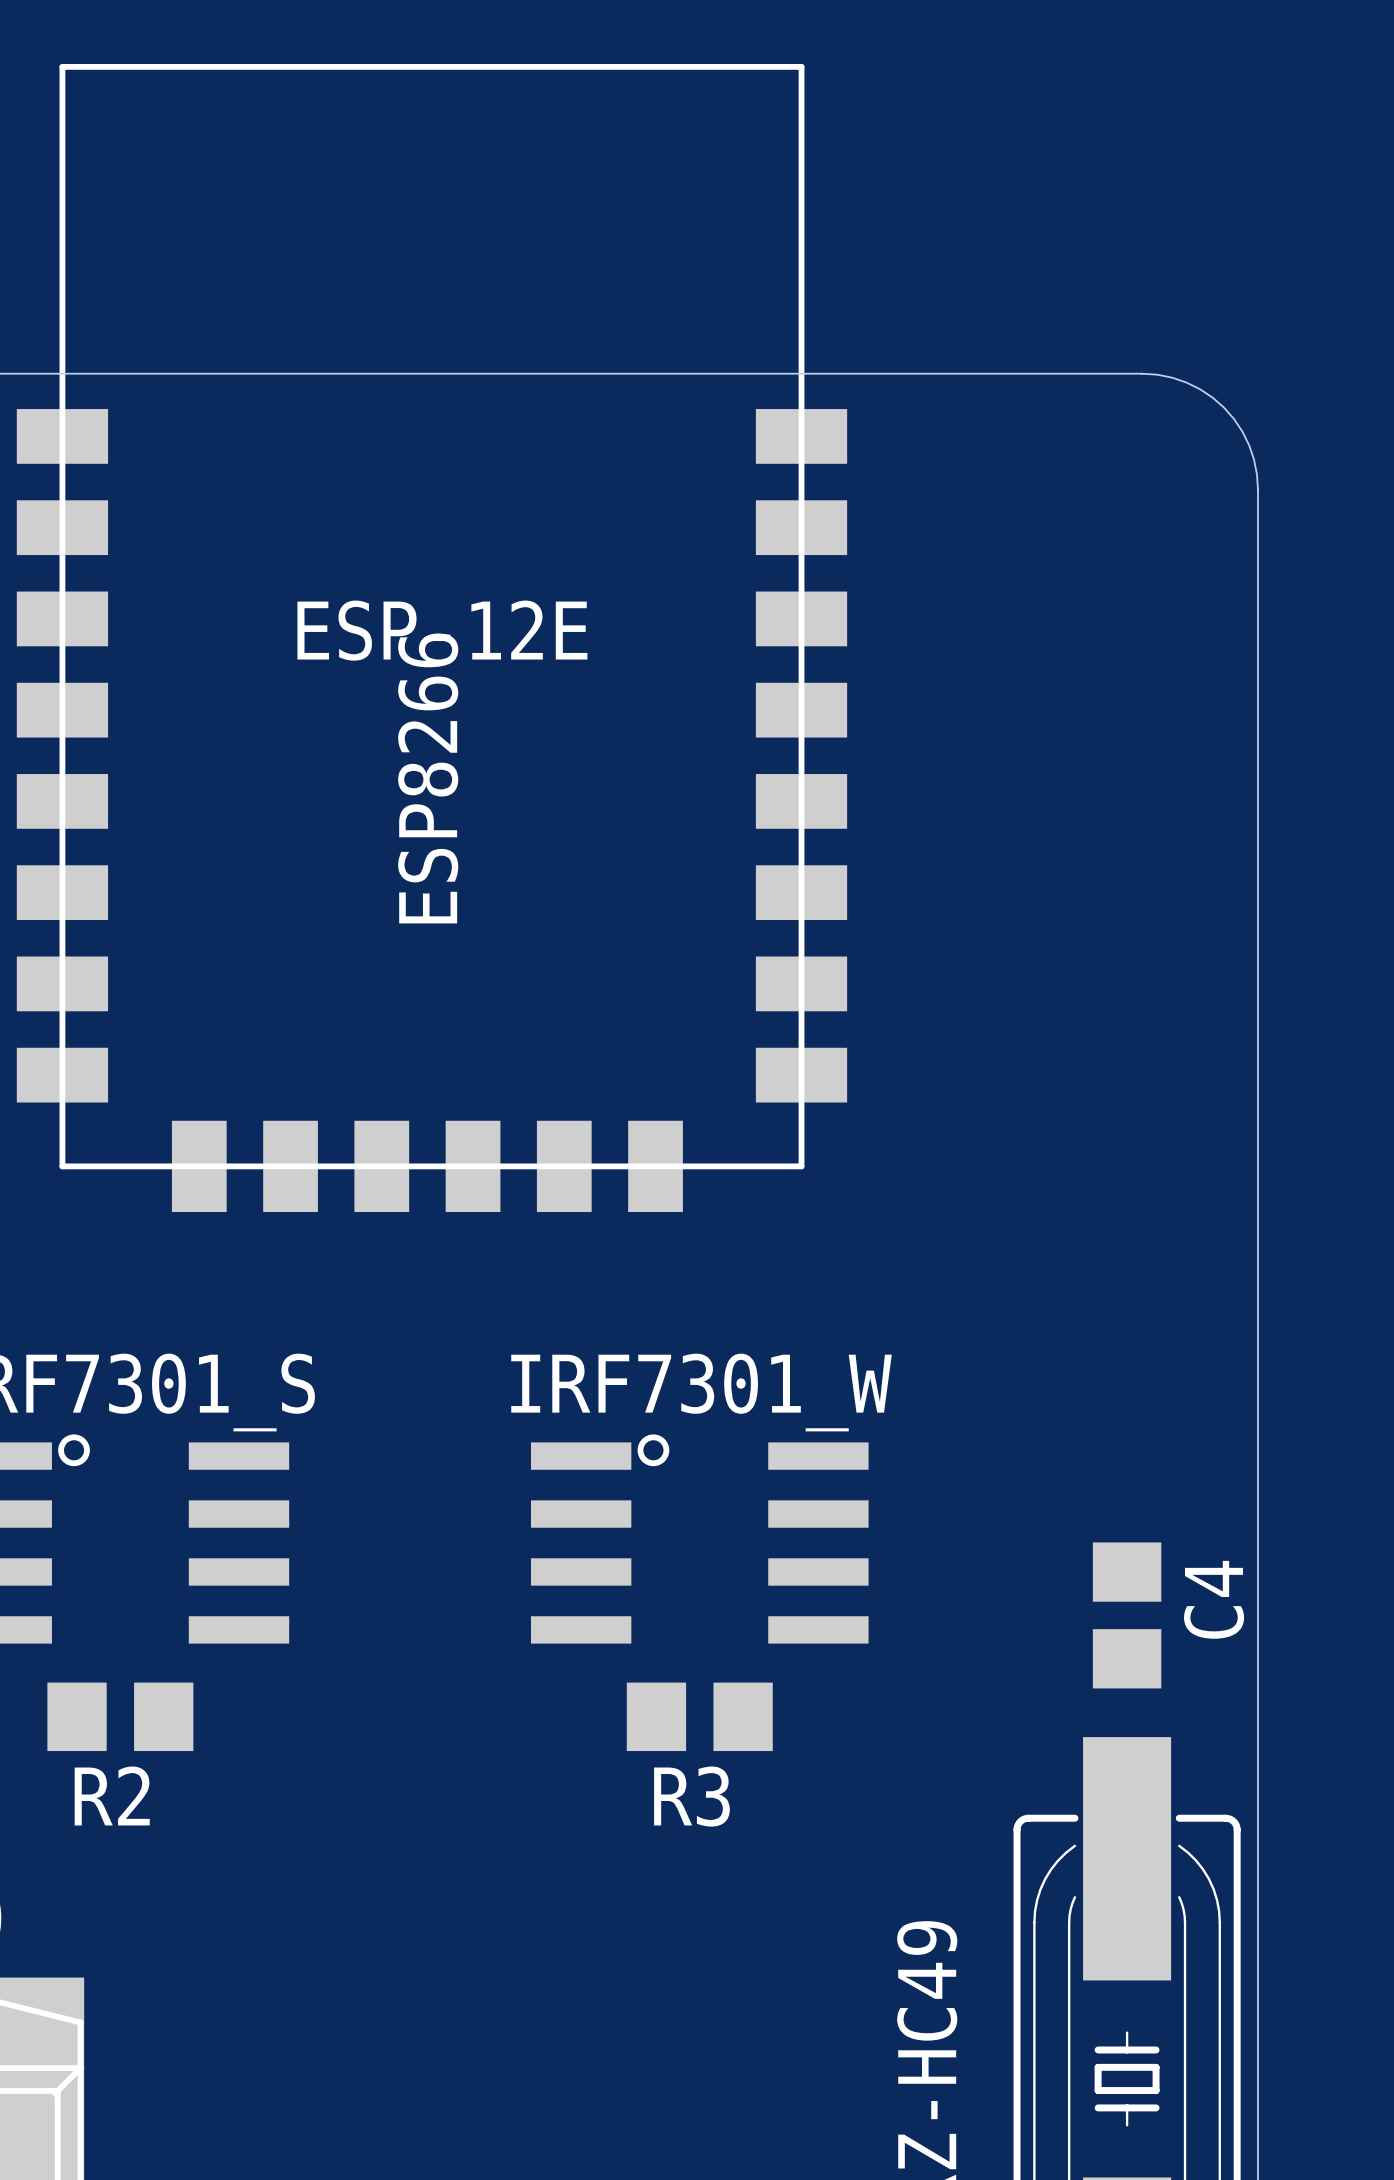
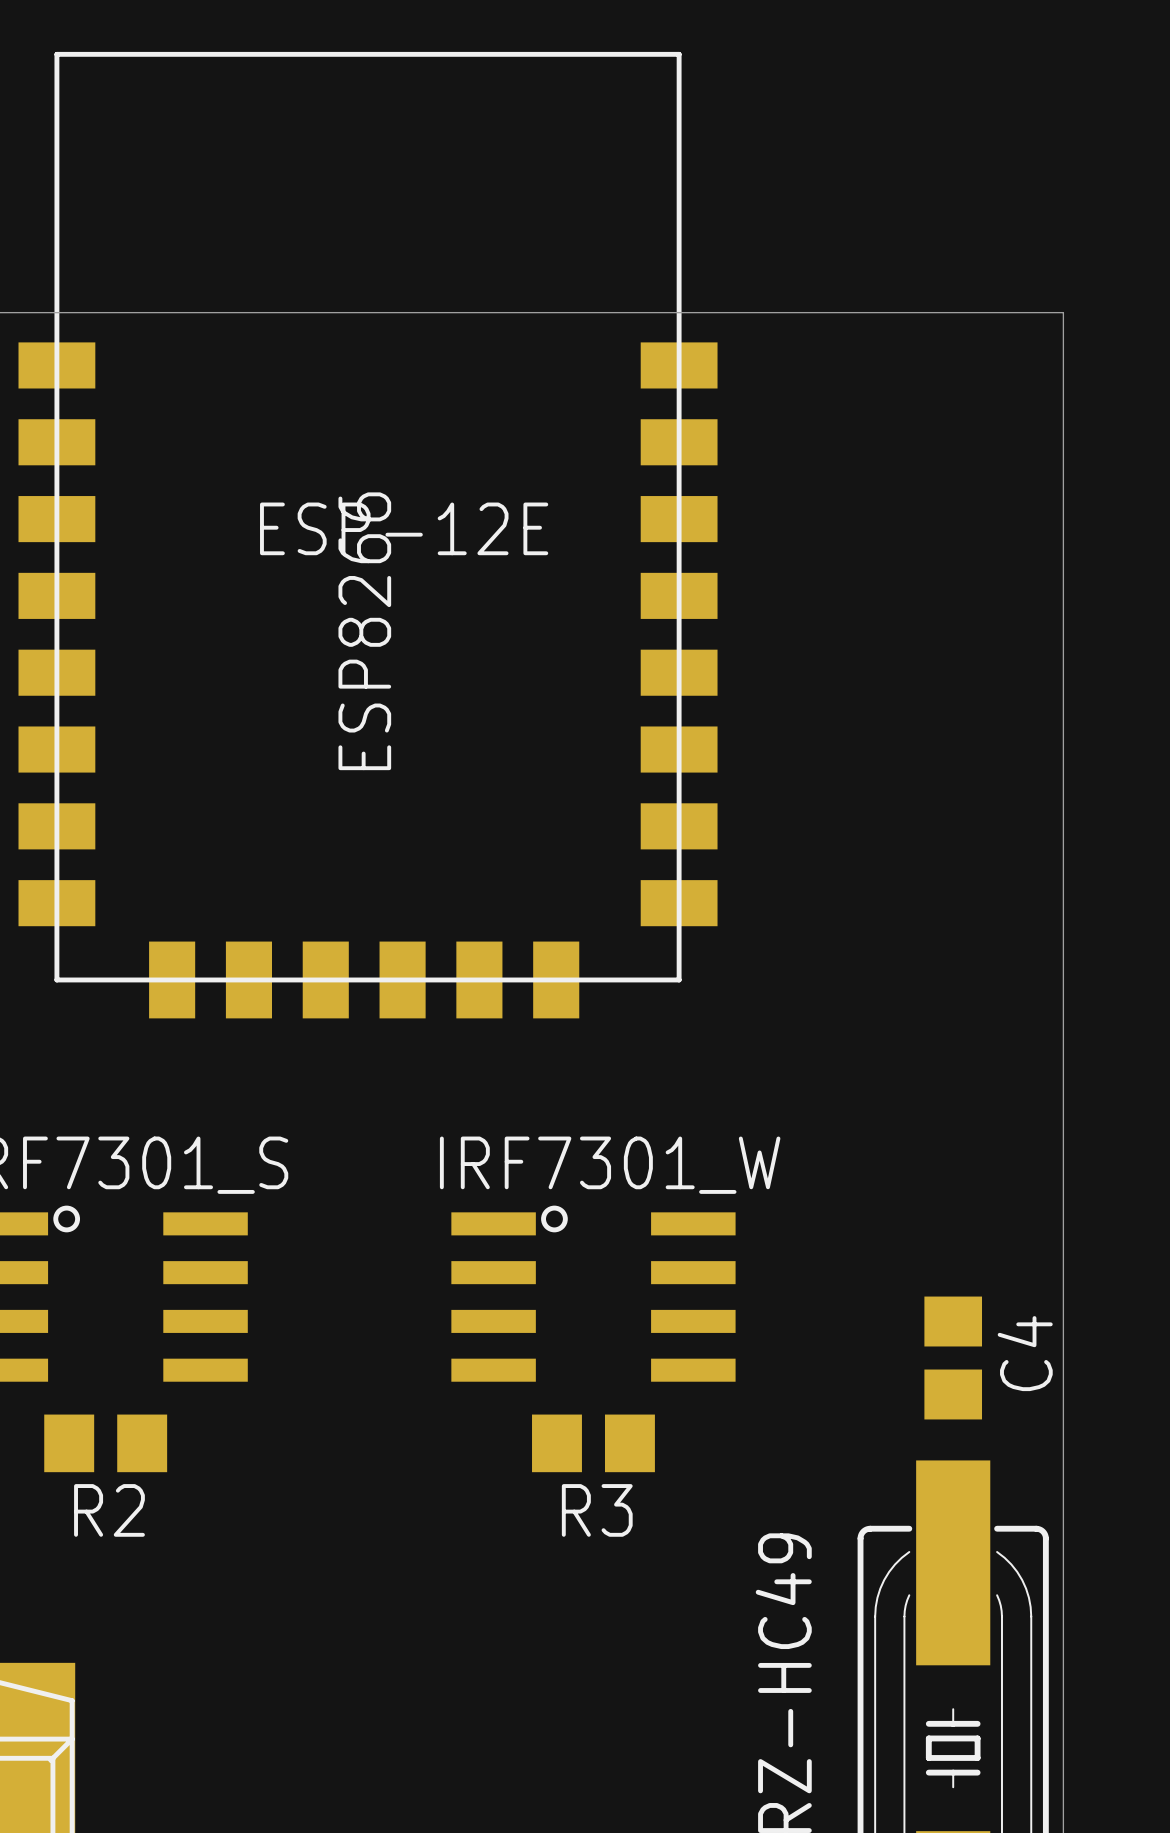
board edge: (1142, 373) (1172, 377) (1186, 382) (1212, 397) (1224, 407) (1234, 419) (1249, 445) (1254, 459) (1257, 489) -> (965, 312) (1063, 312) (1063, 410)

